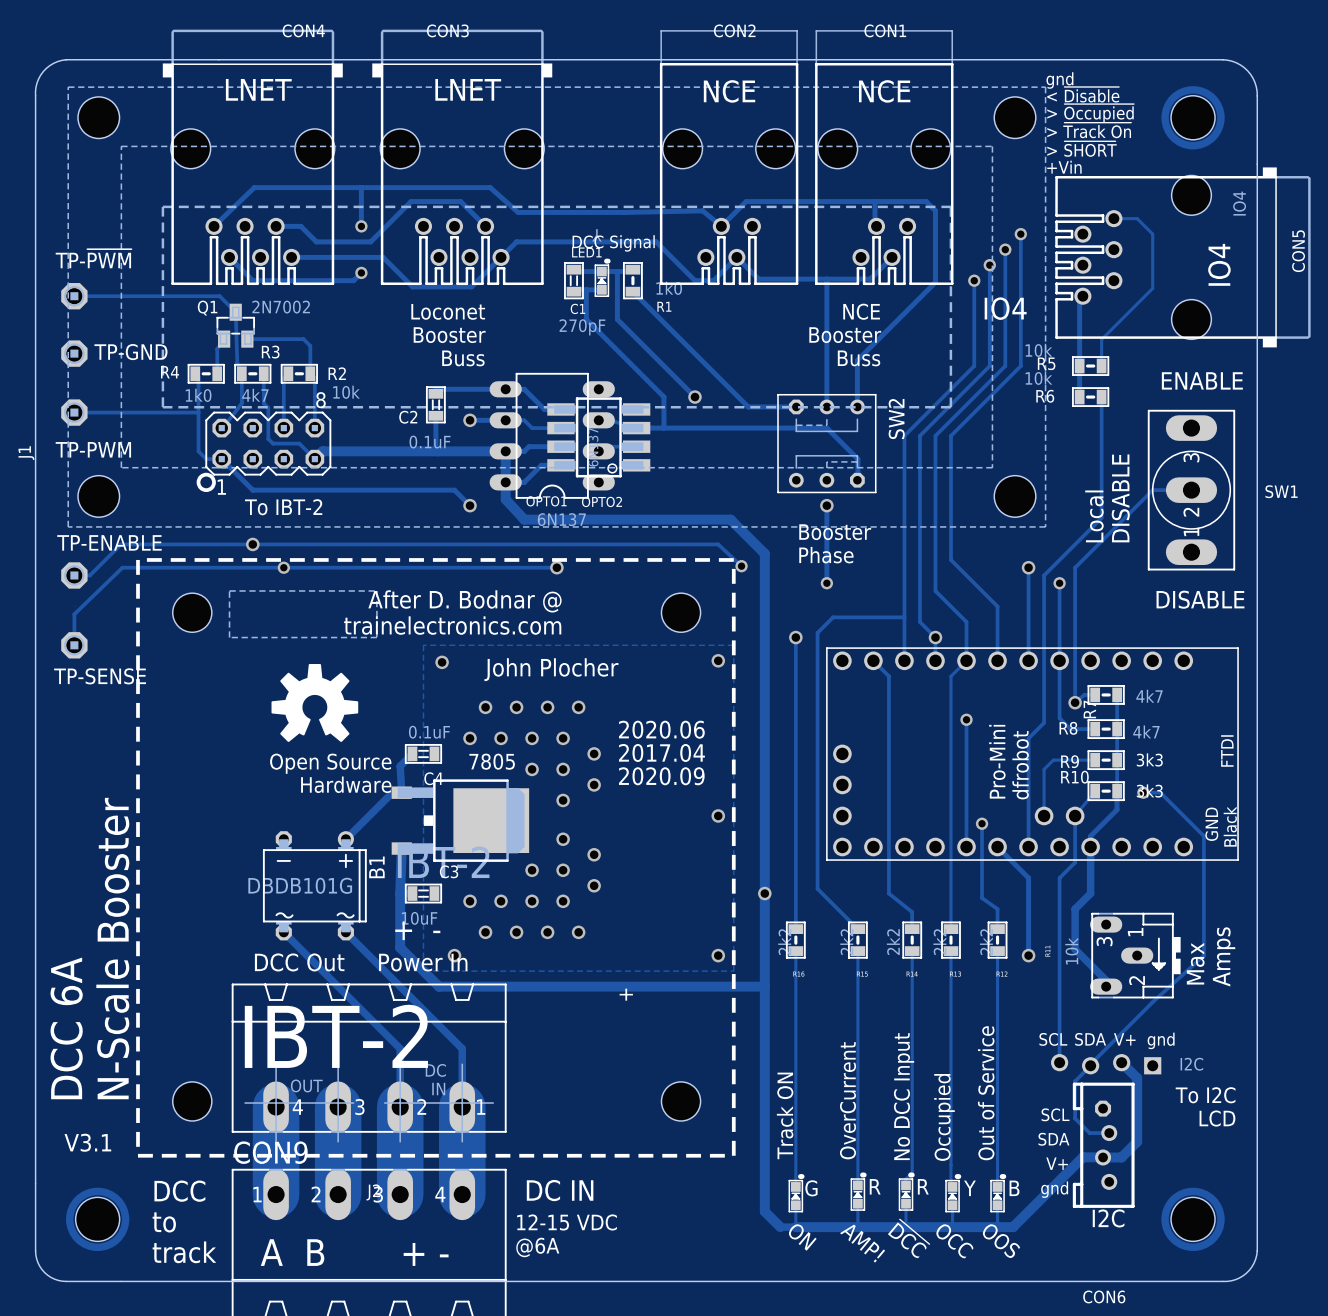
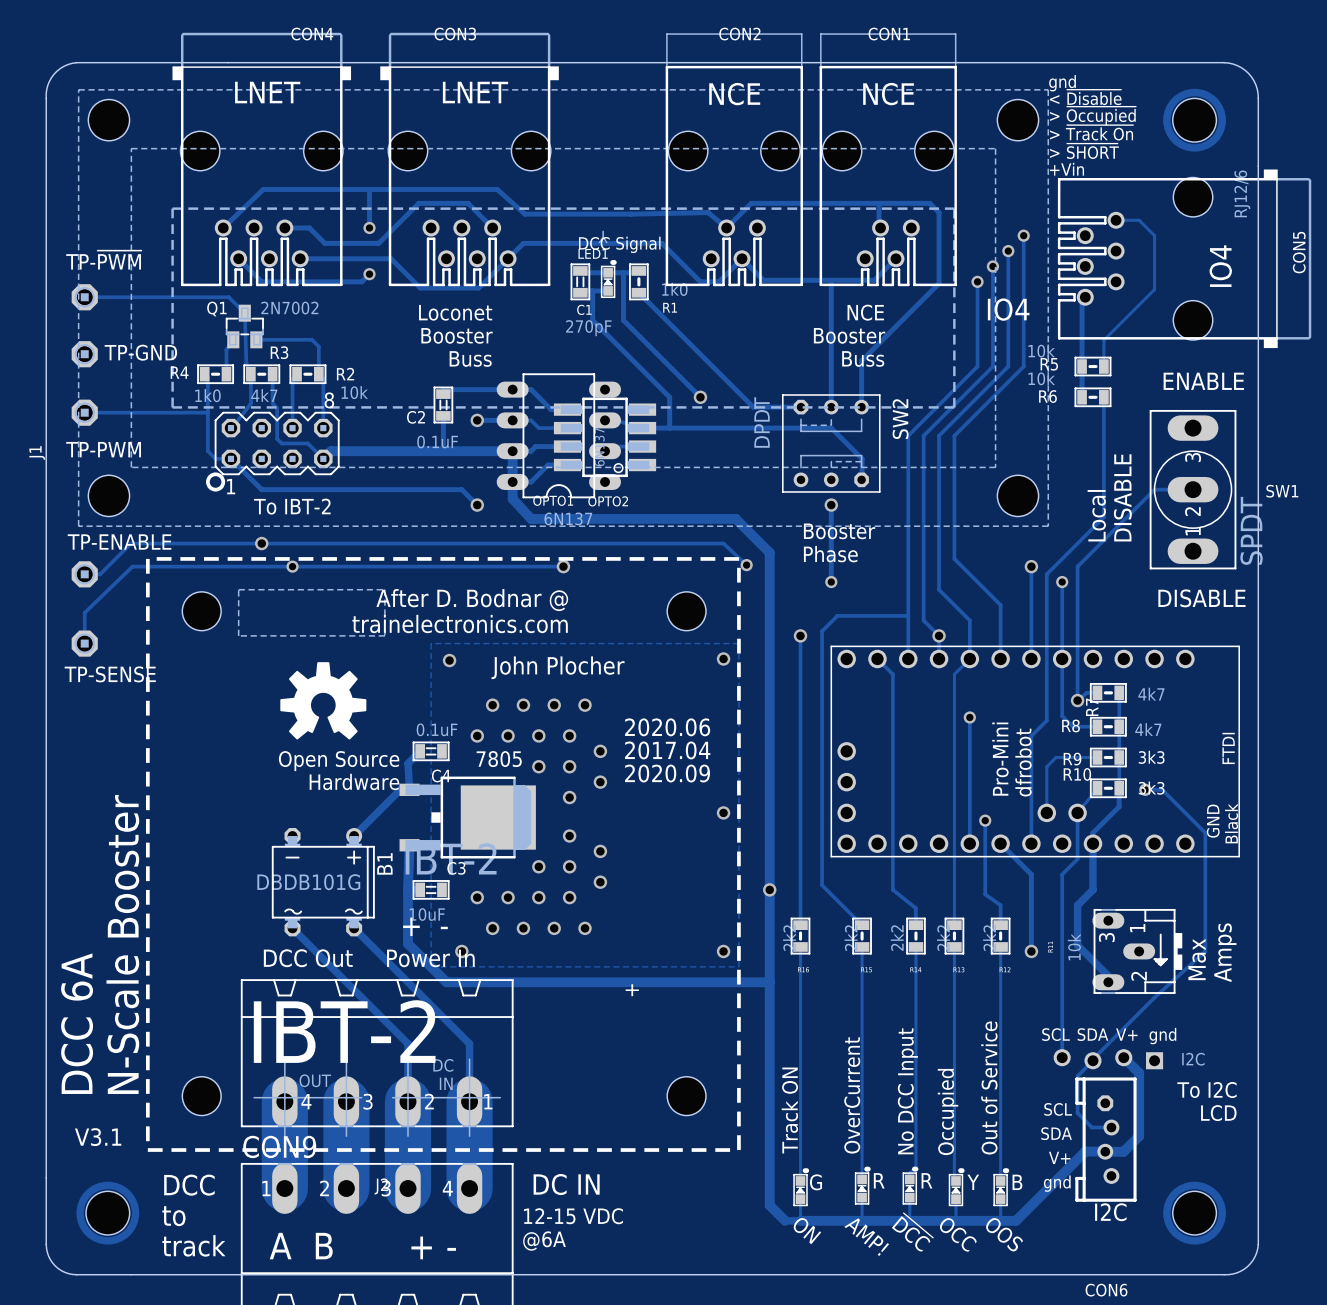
CON5 value: IO4 (1239, 203) -> RJ12/6 (1242, 193)
SW2 value: none -> DPDT (762, 422)
SW1 value: none -> SPDT (1251, 530)

